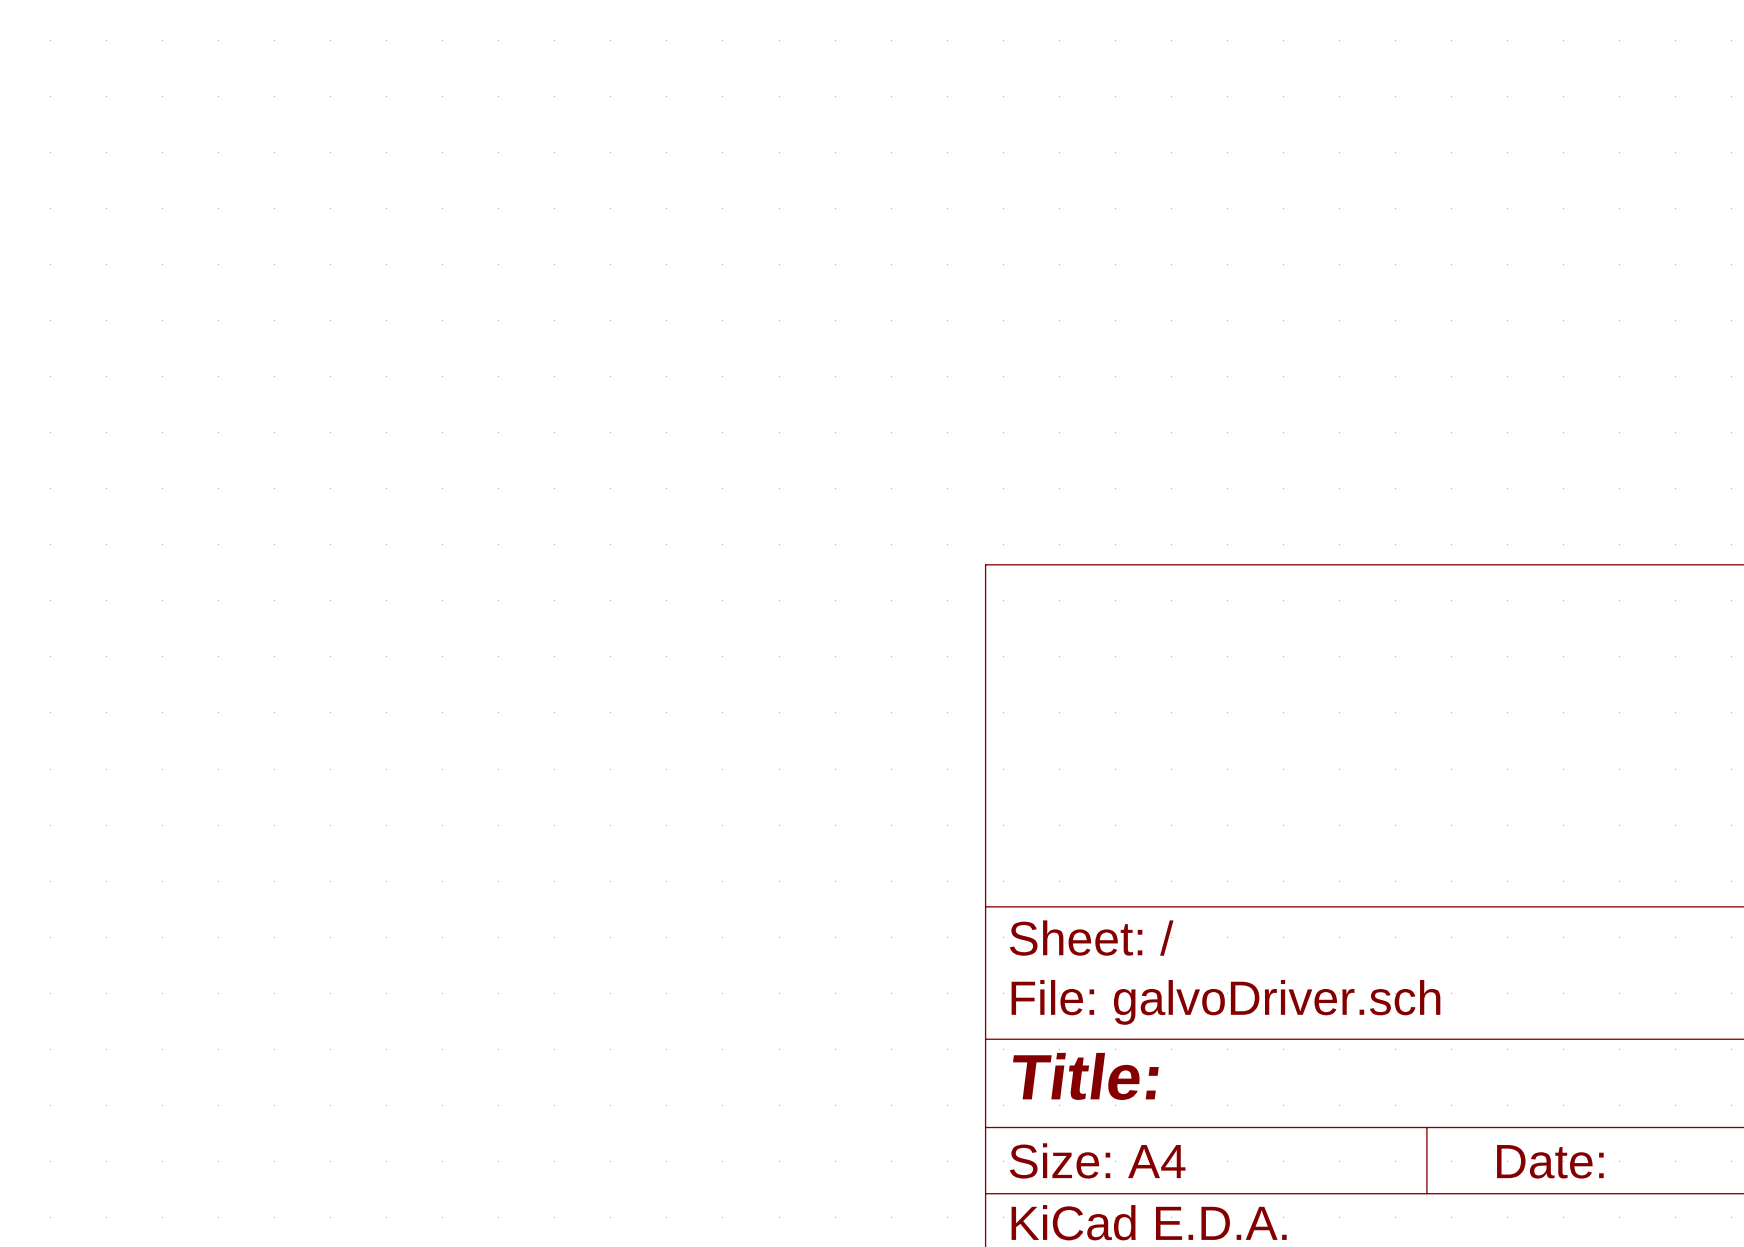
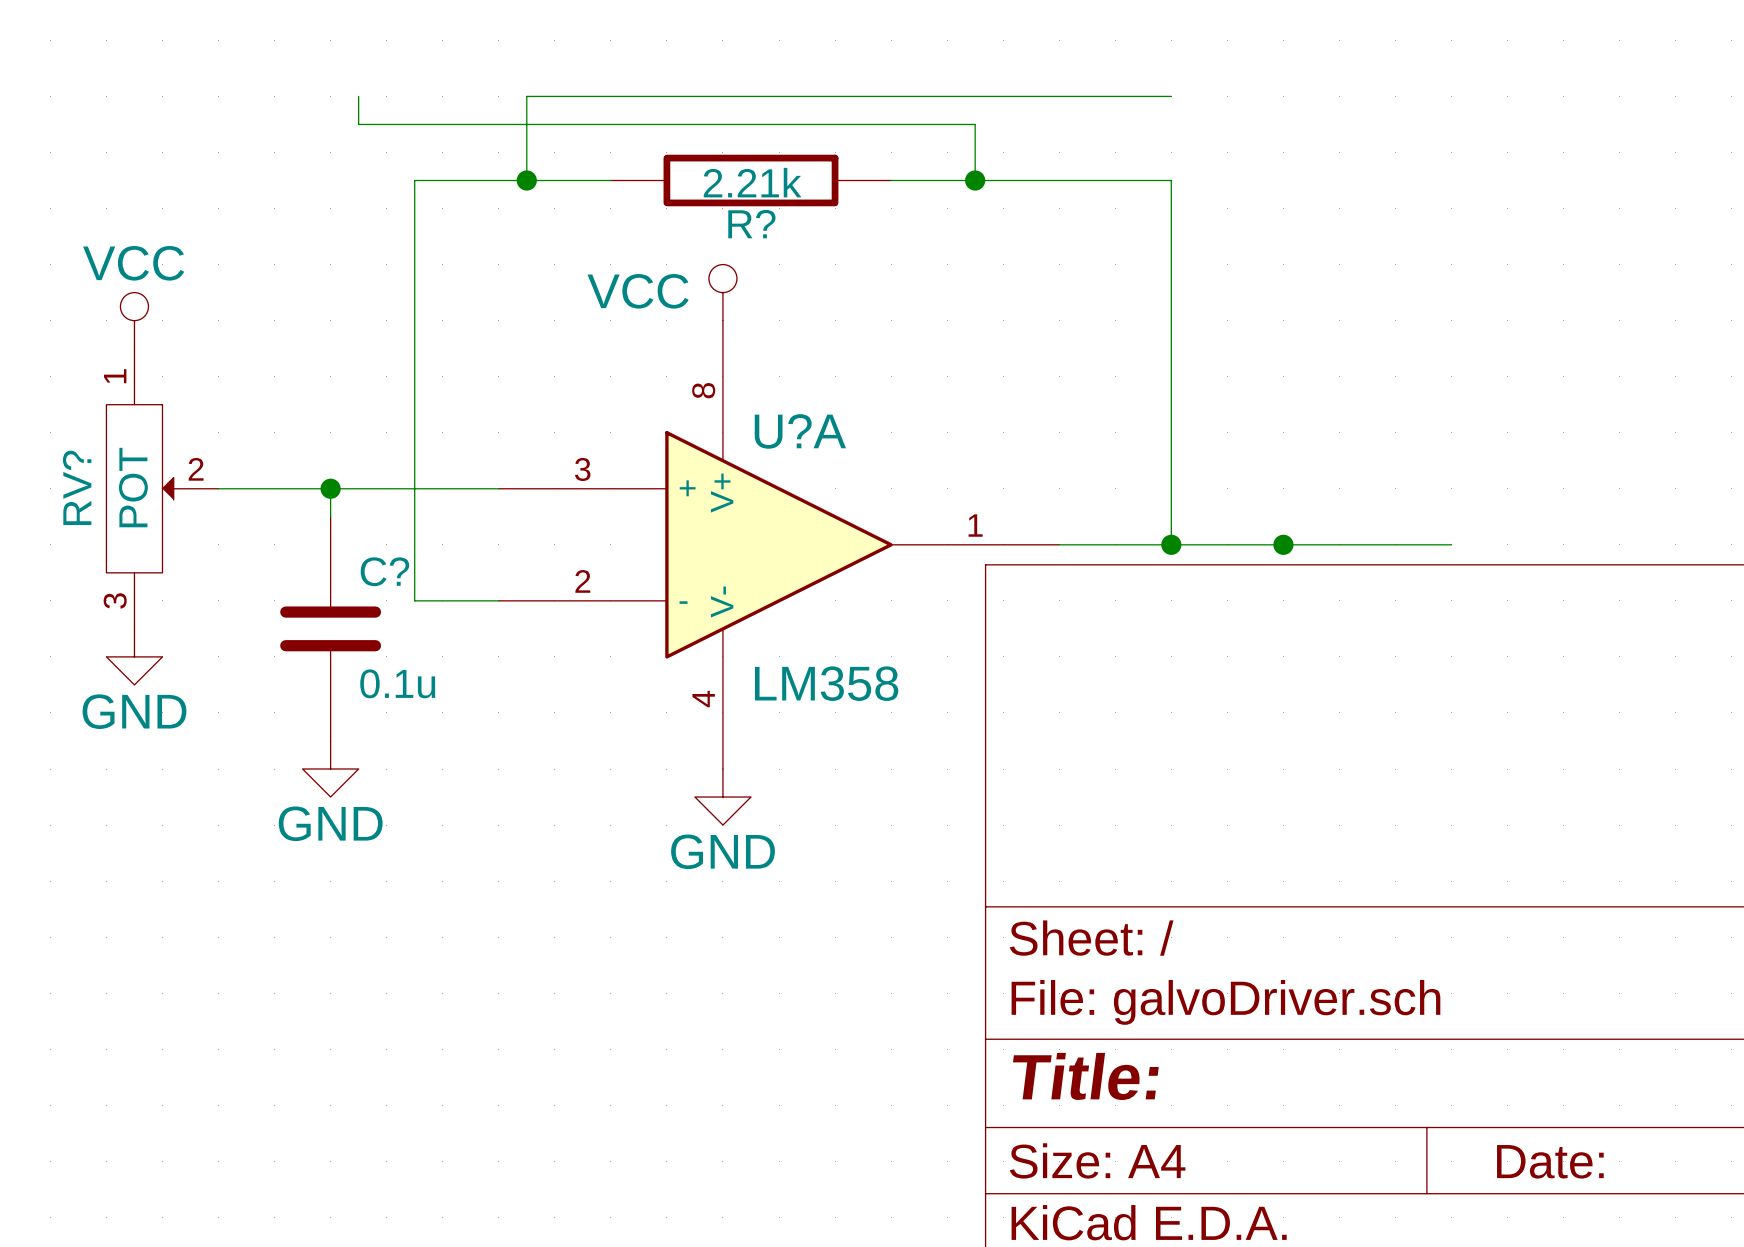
wire: none -> (358, 96) (358, 124) (975, 124) (975, 180)
wire: none -> (1171, 96) (526, 96) (526, 180)
junction: none -> (526, 180)
wire: none -> (610, 180) (414, 180) (414, 600) (498, 600)
R?: none -> 2.21k (750, 180)
wire: none -> (891, 180) (1171, 180) (1171, 544)
junction: none -> (975, 180)
power symbol: none -> VCC (722, 292)
power symbol: none -> VCC (134, 320)
RV?: none -> POT (162, 488)
wire: none -> (218, 488) (498, 488)
wire: none -> (330, 488) (330, 516)
junction: none -> (330, 488)
U?A: none -> LM358 (779, 544)
wire: none -> (1059, 544) (1451, 544)
junction: none -> (1171, 544)
junction: none -> (1283, 544)
C?: none -> 0.1u (330, 628)
power symbol: none -> GND (134, 656)
power symbol: none -> GND (330, 769)
power symbol: none -> GND (722, 797)

